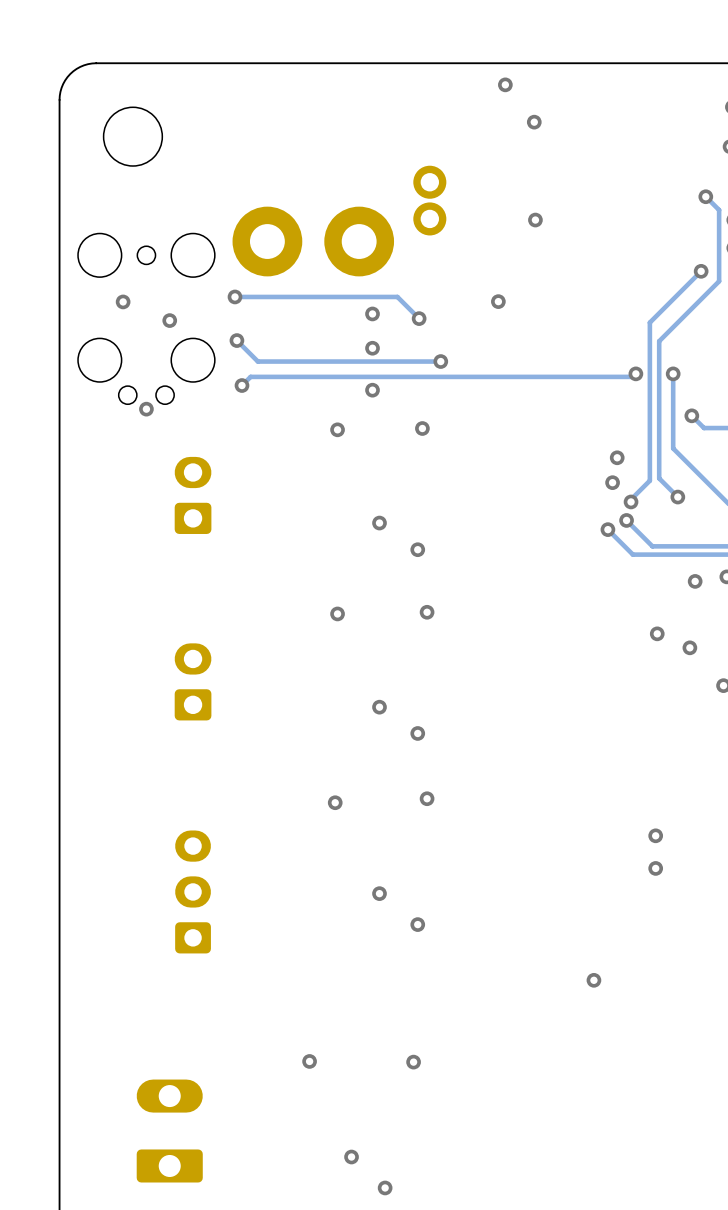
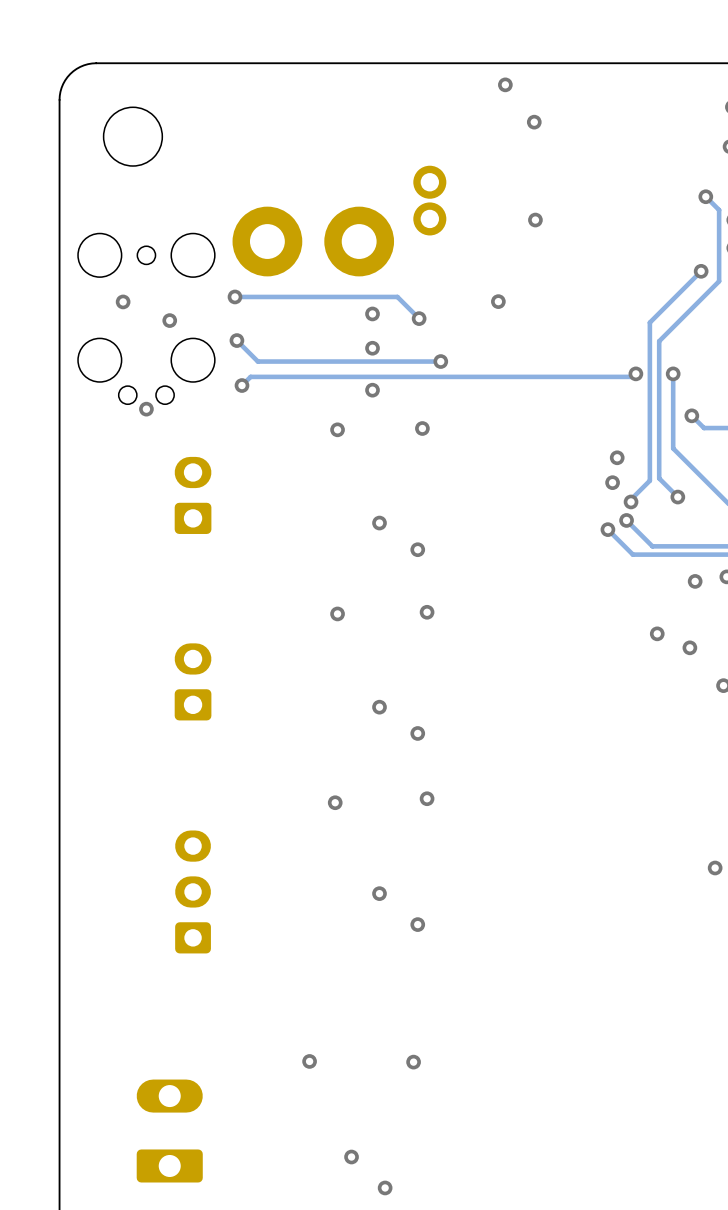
via: (655, 835) -> none
via: none -> (715, 867)
via: (655, 868) -> none
via: (593, 980) -> none

